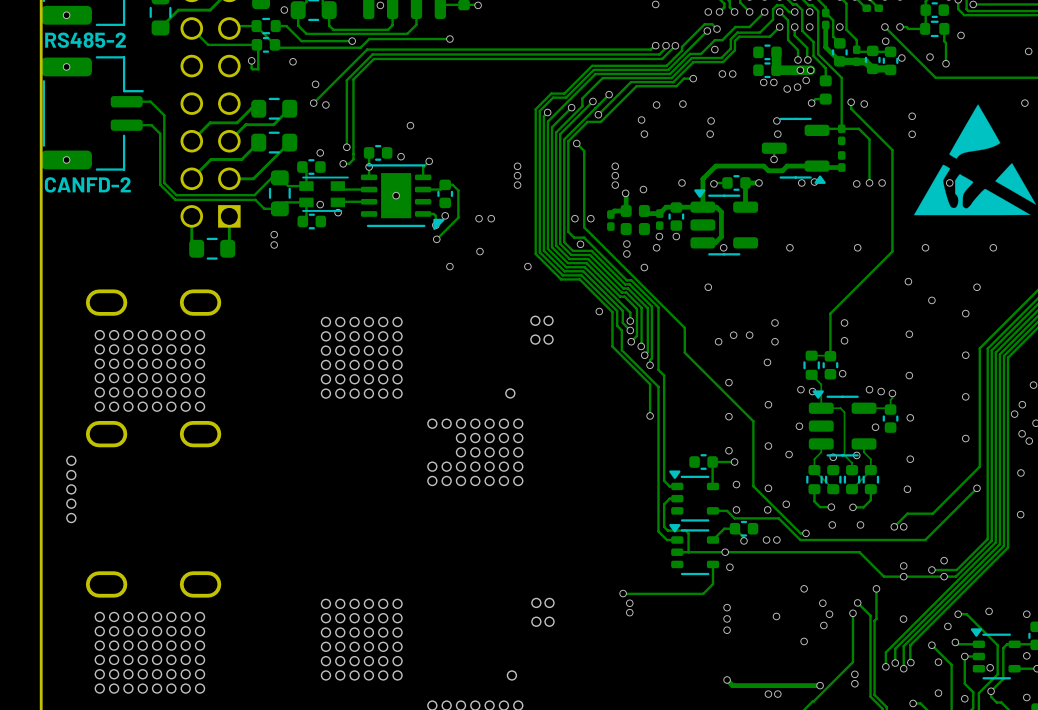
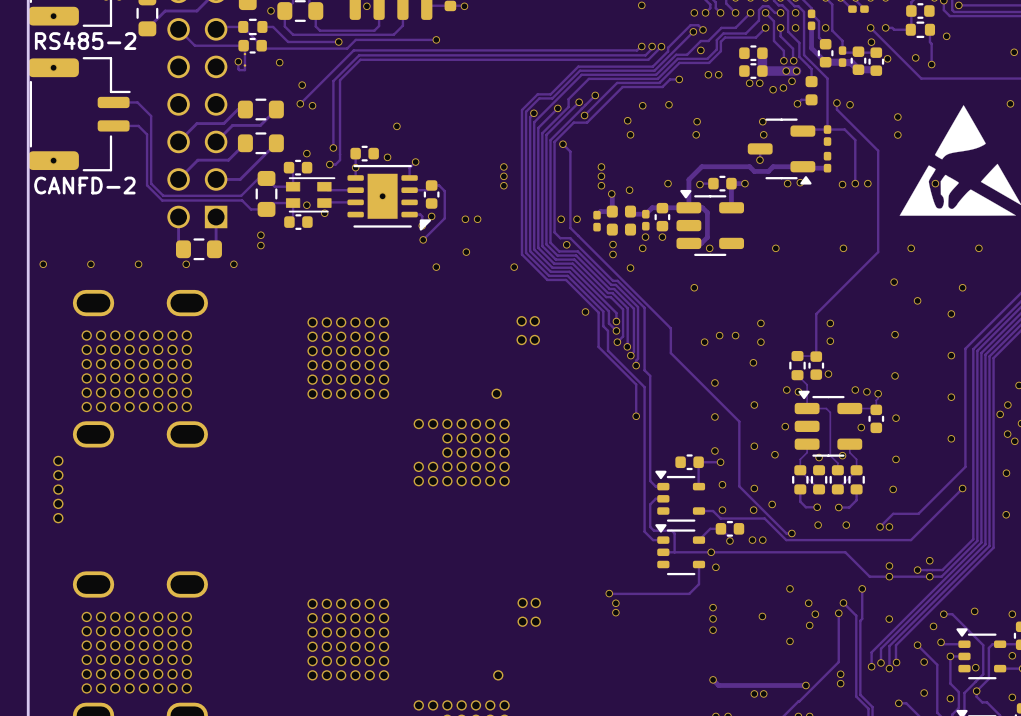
via: none -> (43, 264)
via: none -> (90, 264)
via: none -> (138, 264)
via: none -> (186, 264)
via: none -> (233, 264)

